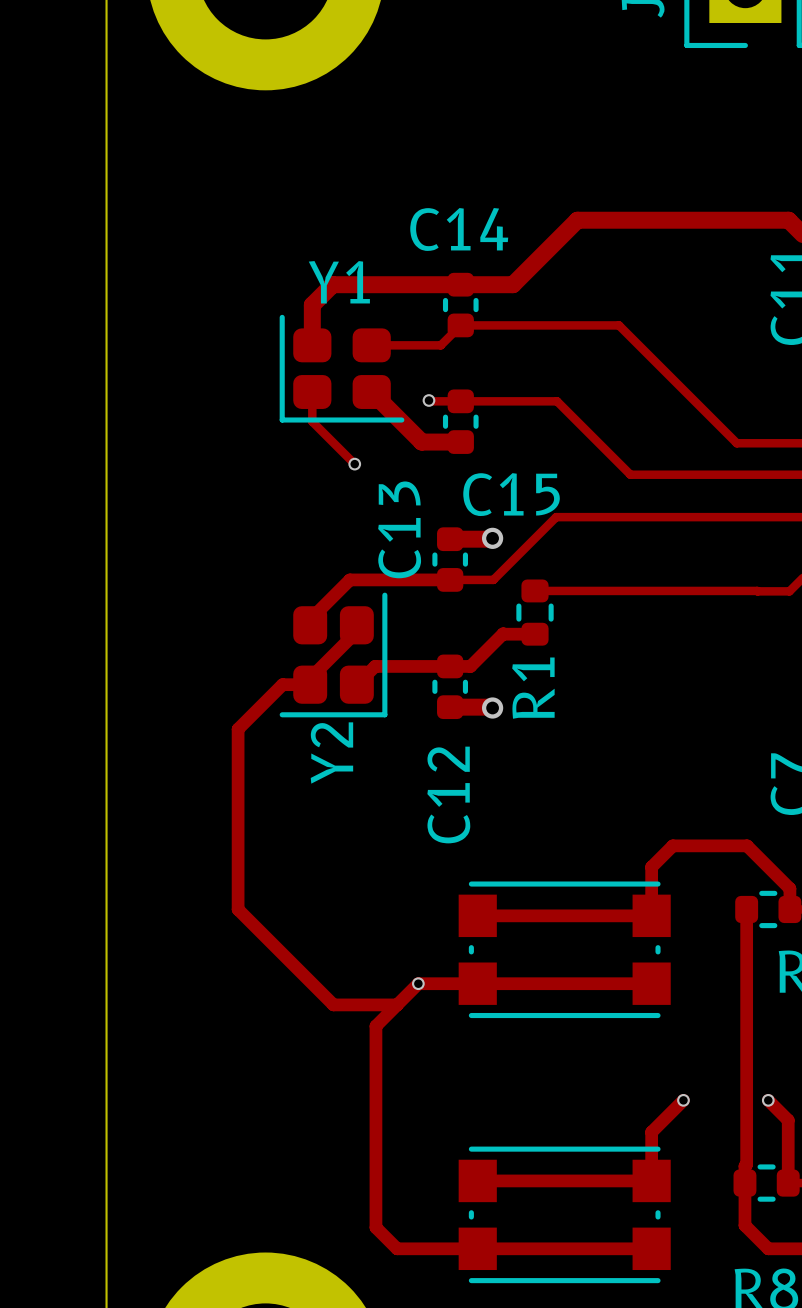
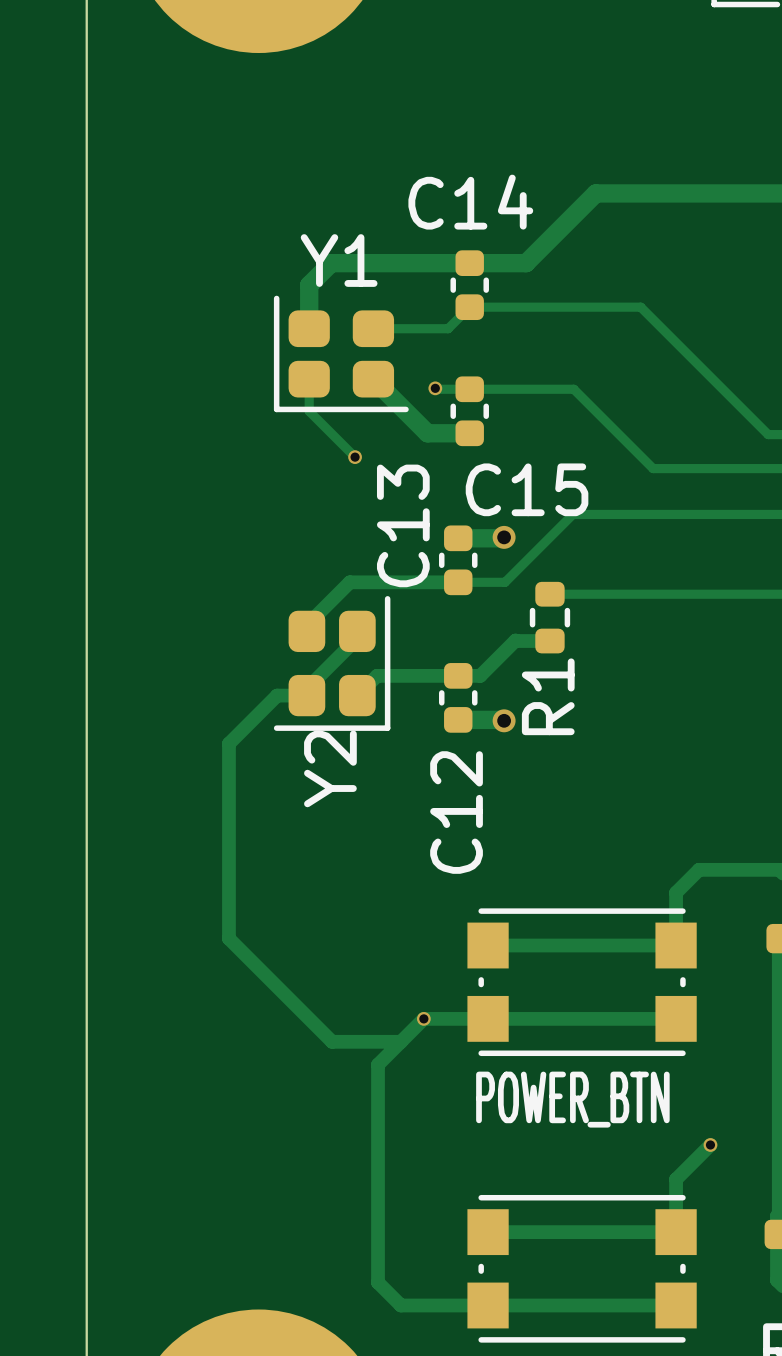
part value: none -> POWER_BTN (572, 1099)

